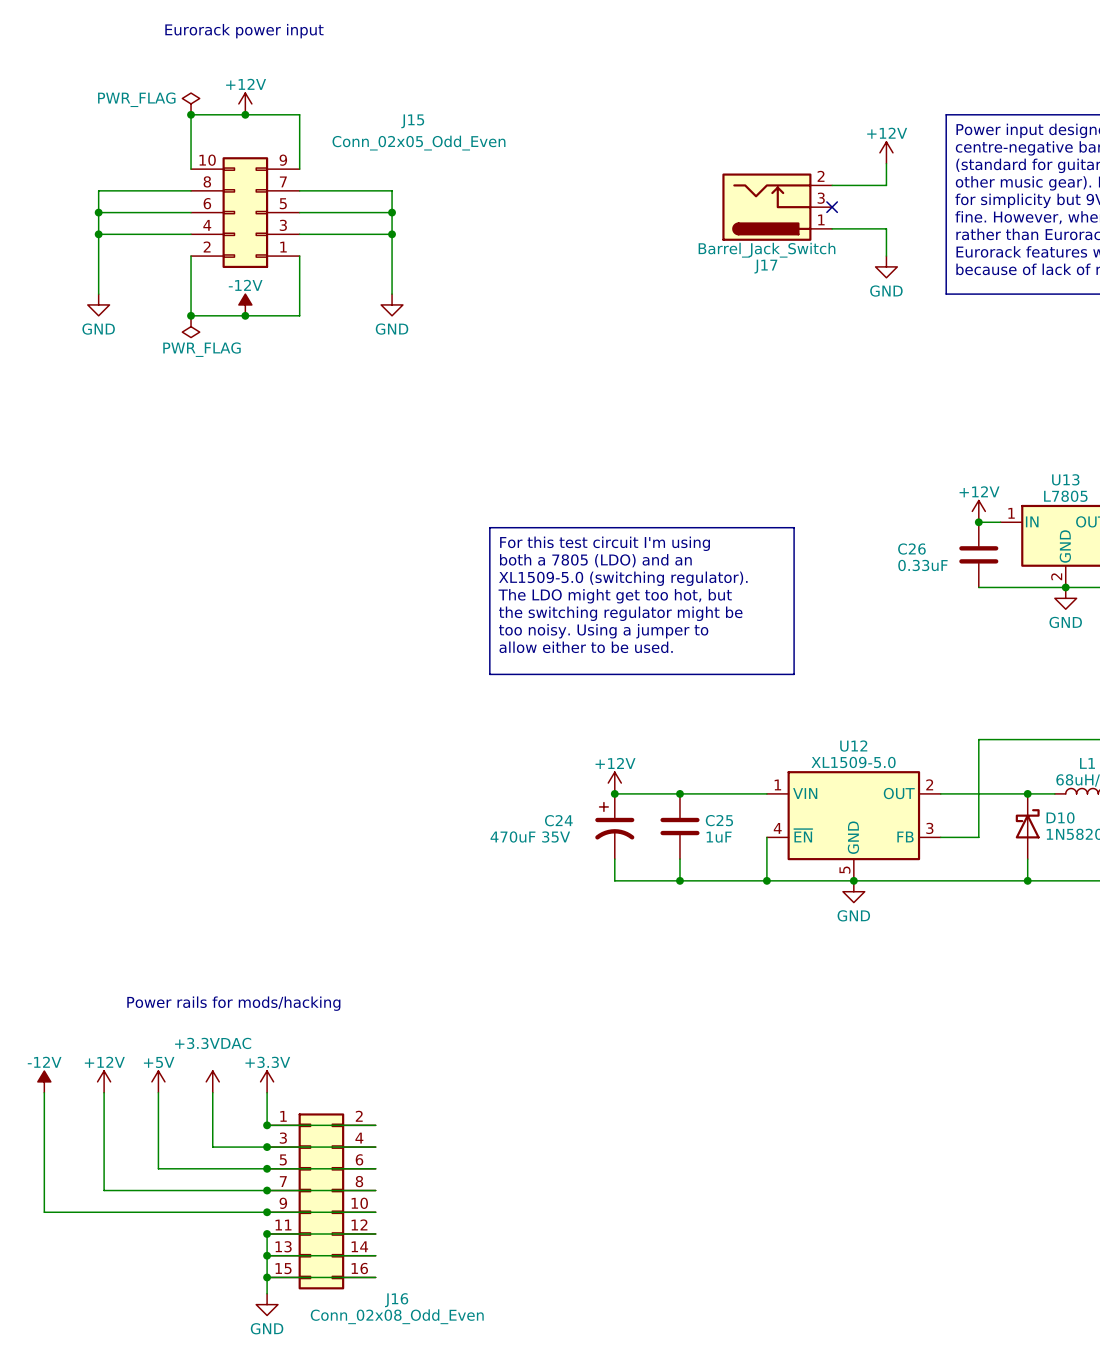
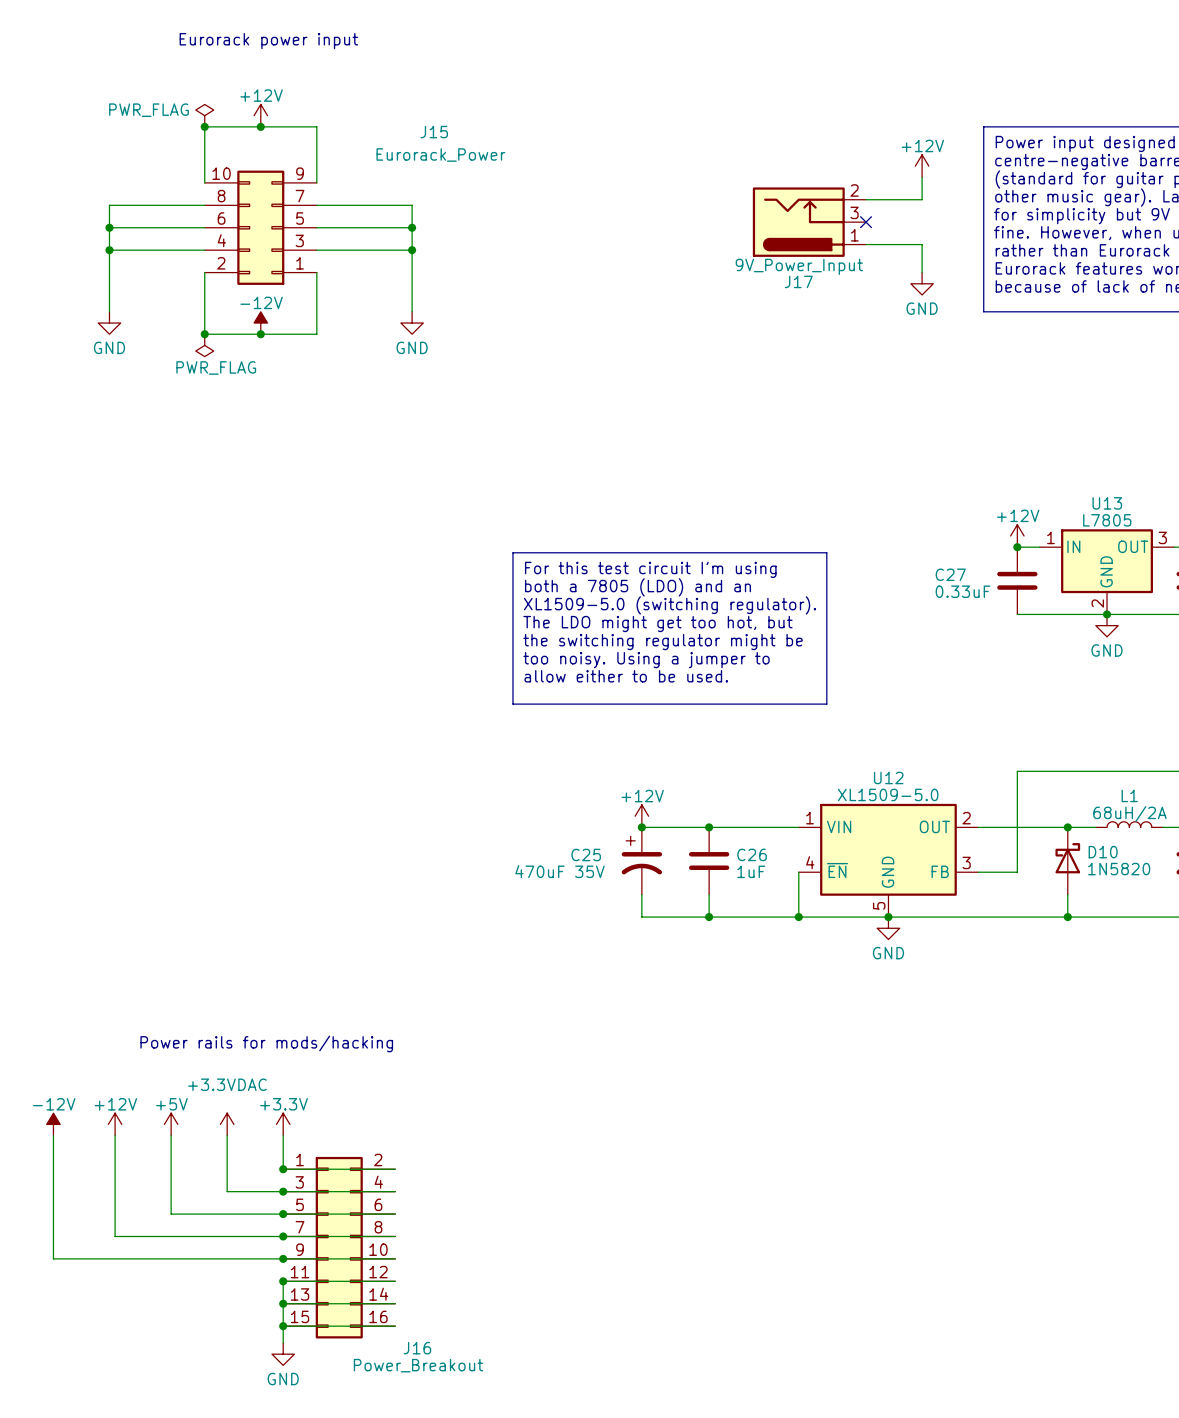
J15 value: Conn_02x05_Odd_Even (418, 143) -> Eurorack_Power (440, 155)
J17 value: Barrel_Jack_Switch (767, 250) -> 9V_Power_Input (799, 266)
C26 name: C26 (911, 549) -> C27 (950, 574)
C24 name: C24 (558, 820) -> C25 (586, 854)
C25 name: C25 (719, 820) -> C26 (752, 854)
J16 value: Conn_02x08_Odd_Even (397, 1316) -> Power_Breakout (418, 1365)

